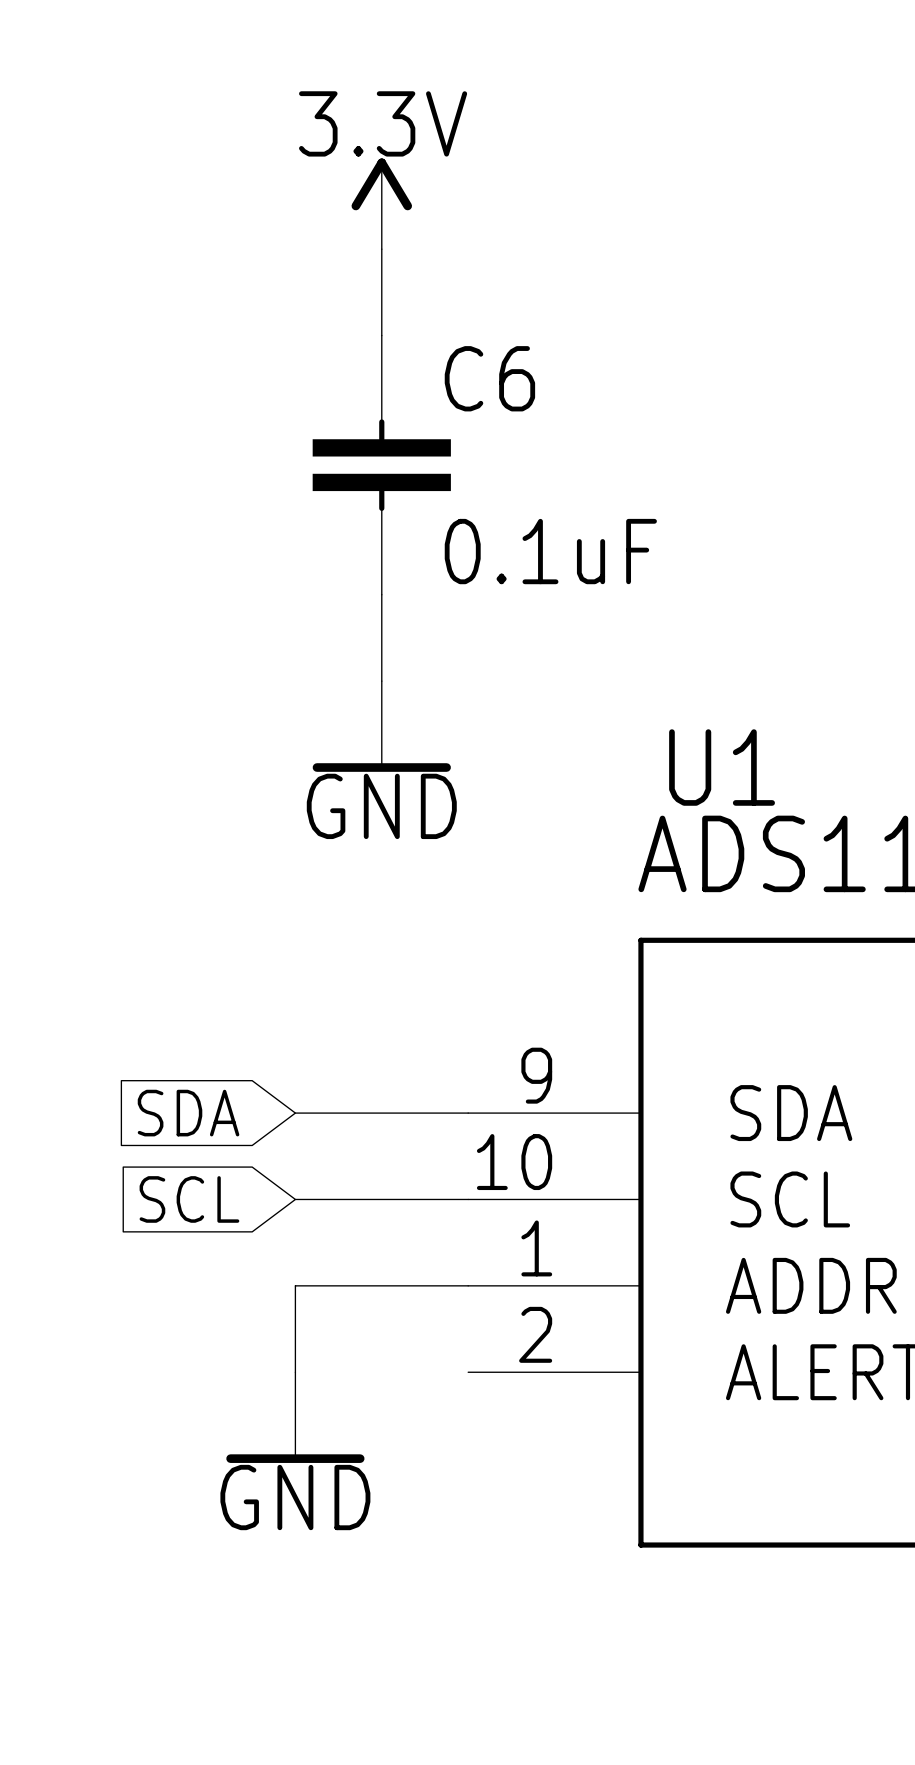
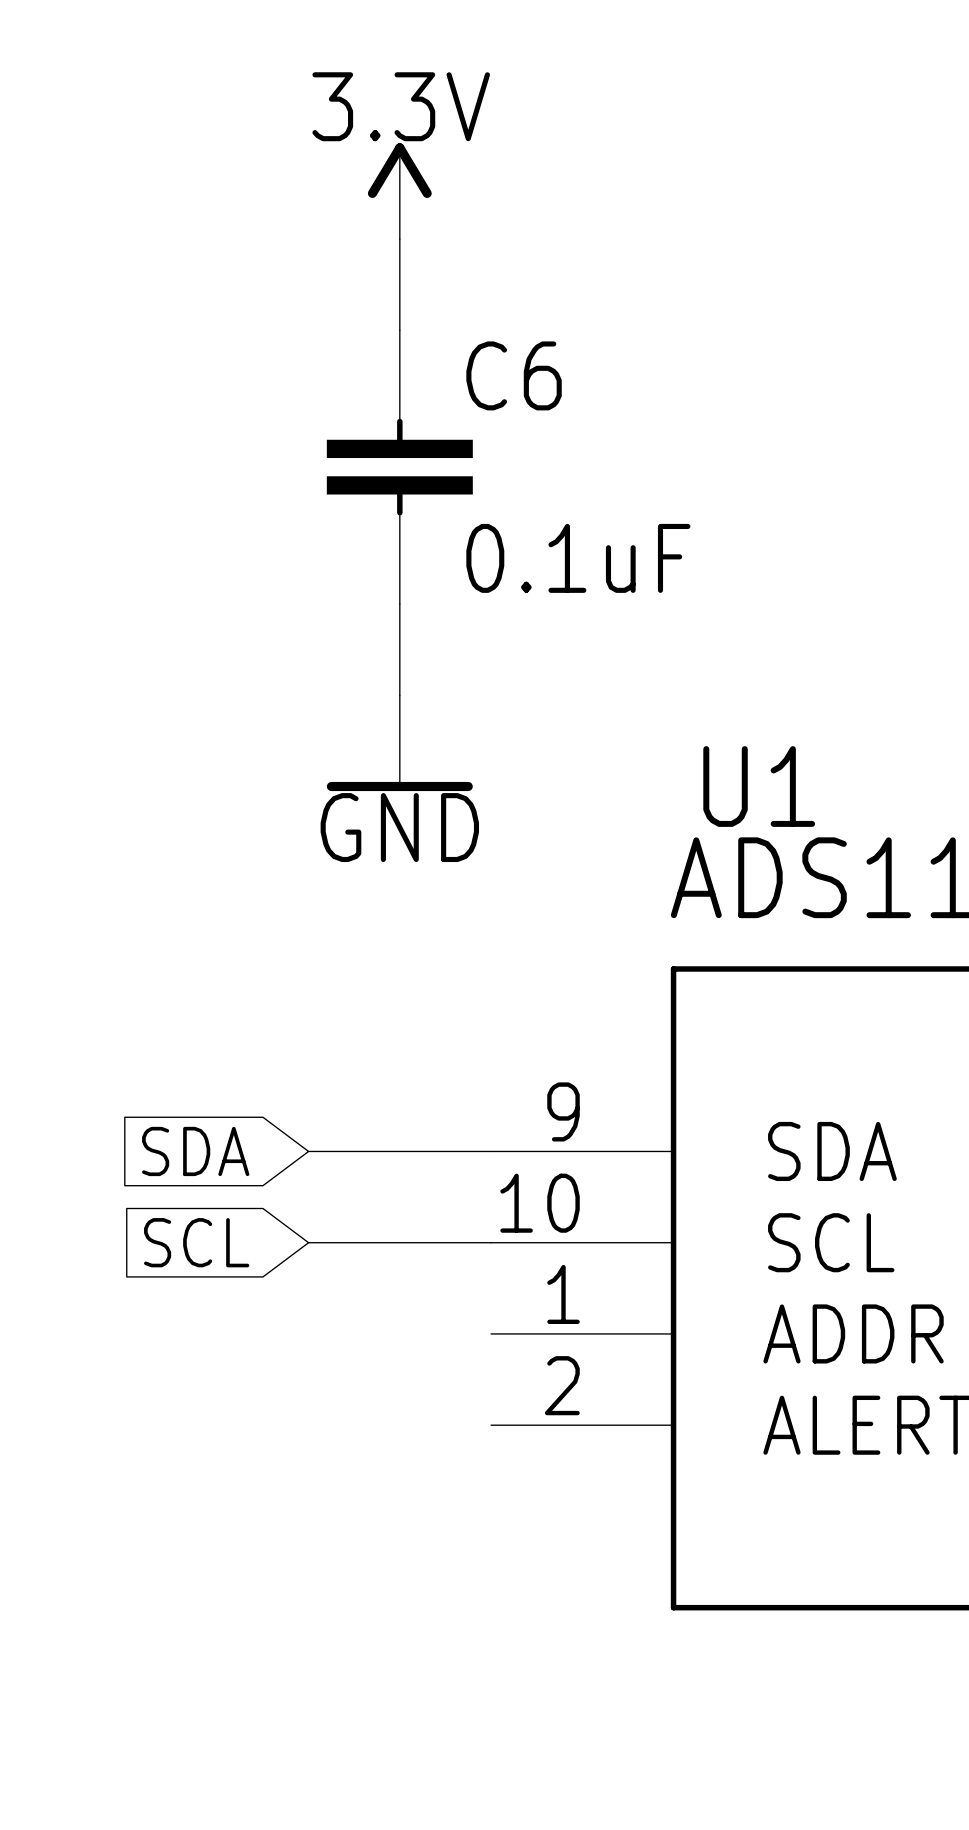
wire: (468, 1285) (295, 1285) (295, 1372) -> none
power symbol: GND (295, 1417) -> none

